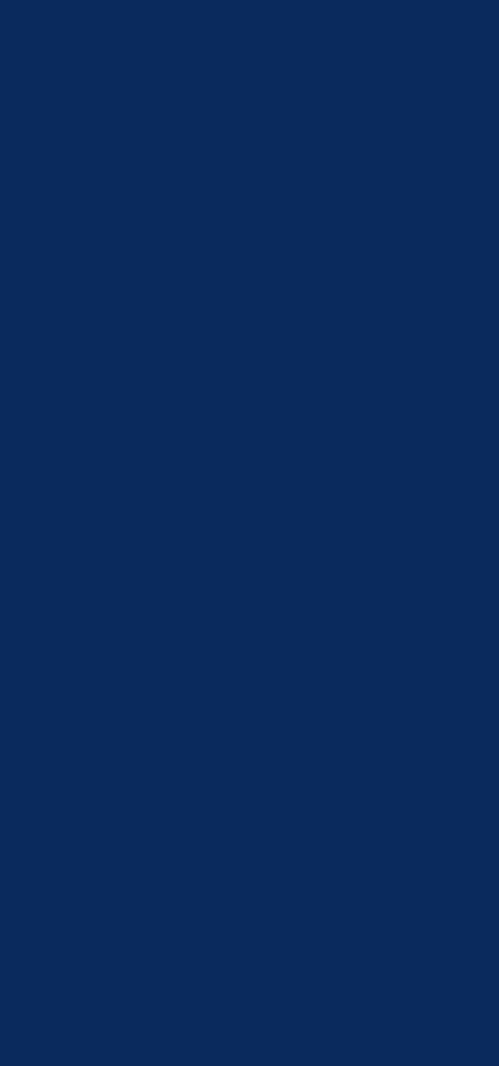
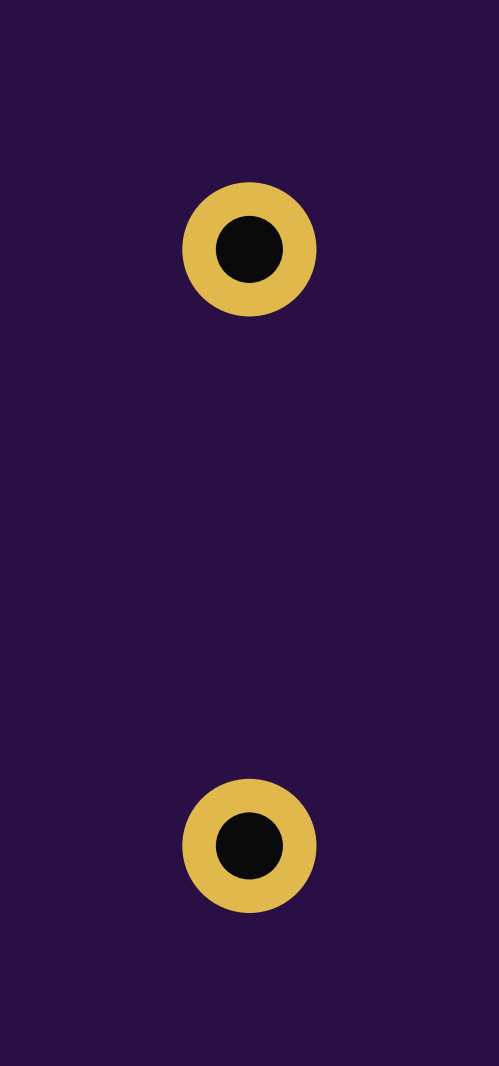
part: none -> (249, 249)
part: none -> (249, 845)

